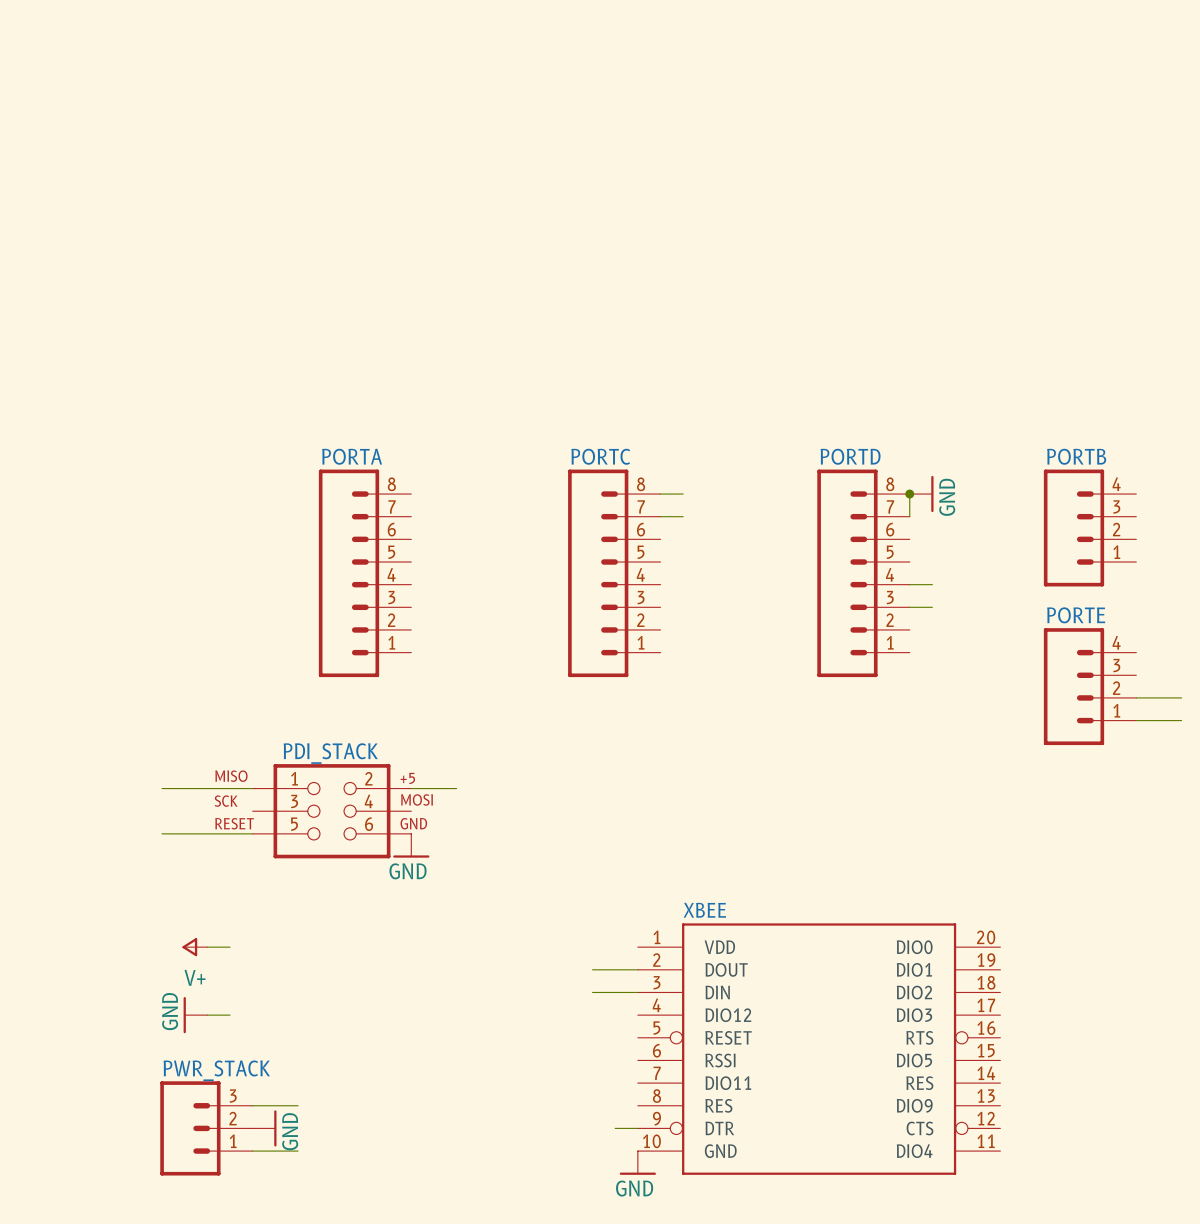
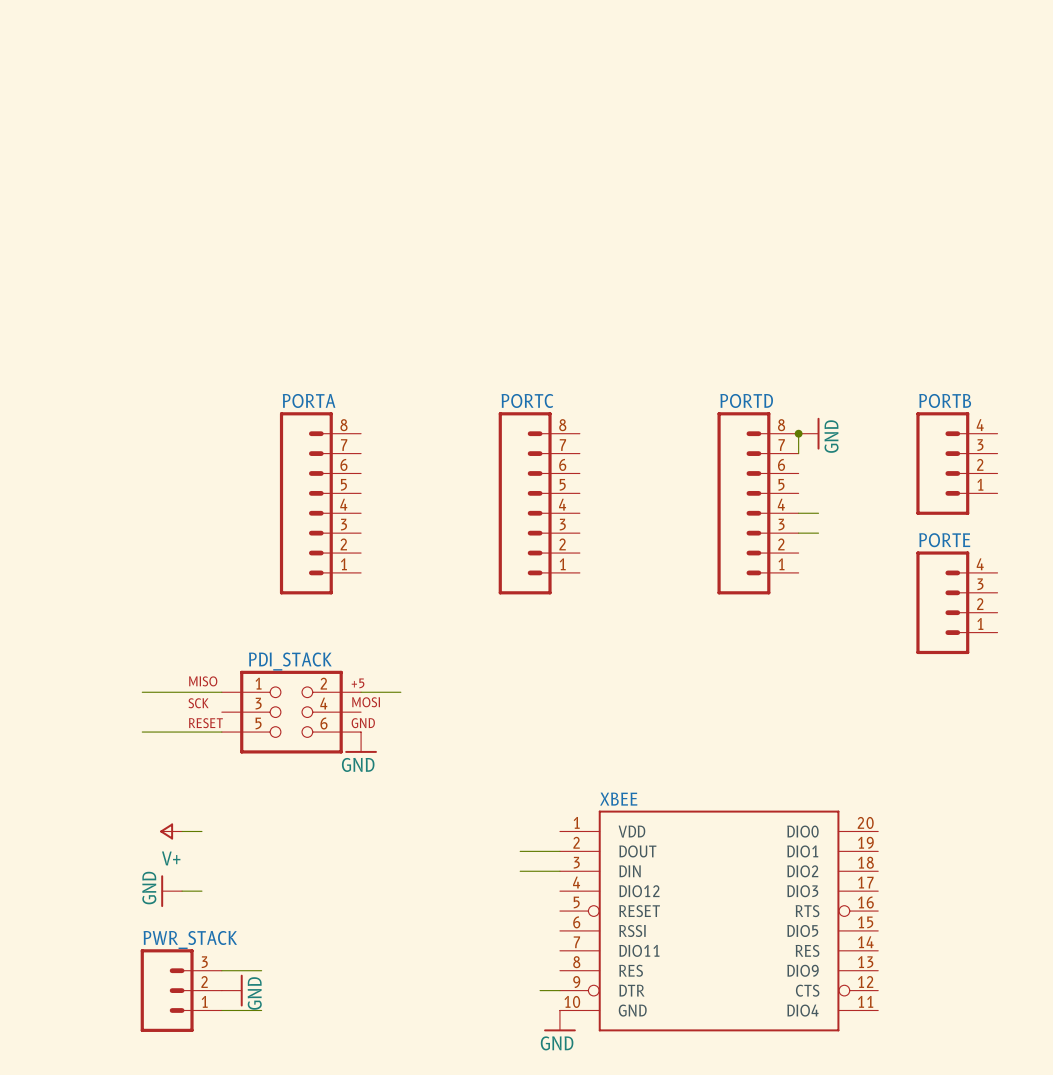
wire: (660, 494) (683, 494) -> none
wire: (660, 516) (683, 516) -> none
wire: (1136, 697) (1181, 697) -> none
wire: (1136, 720) (1181, 720) -> none

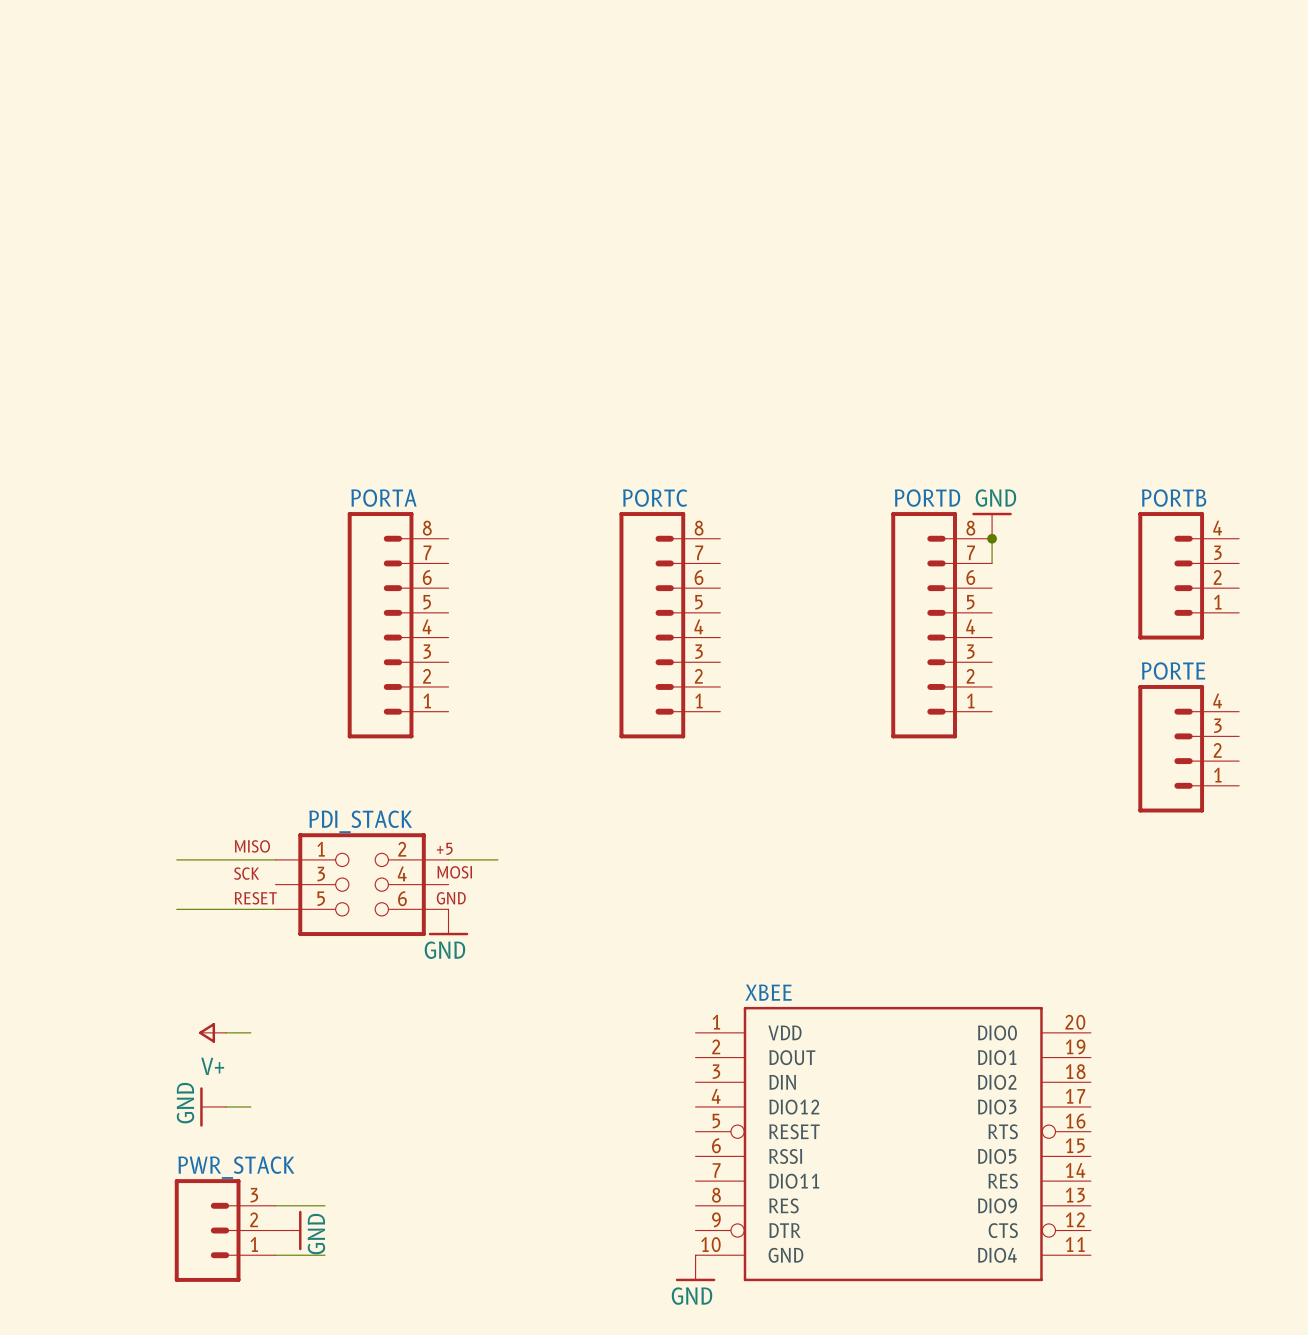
power symbol rotation: 0° (818, 433) -> 90° counterclockwise (992, 514)
wire: (798, 513) (818, 513) -> none
wire: (798, 533) (818, 533) -> none
wire: (520, 851) (559, 851) -> none
wire: (520, 871) (559, 871) -> none
wire: (540, 990) (559, 990) -> none

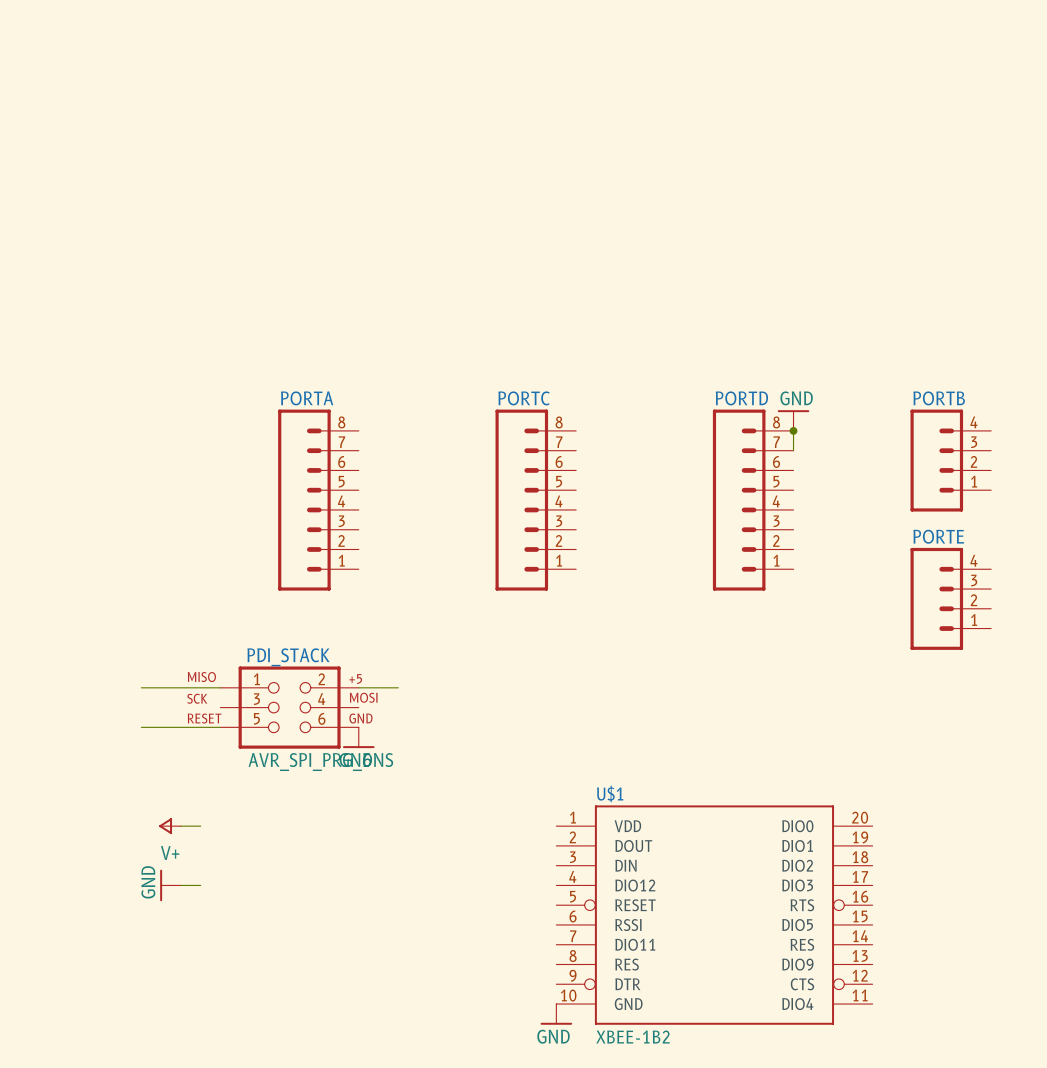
PDI_STACK value: none -> AVR_SPI_PRG_6NS (320, 762)
XBEE name: XBEE (768, 992) -> U$1 (610, 793)
wire: (275, 1205) (324, 1205) -> none
PWR_STACK: (225, 1230) -> none
power symbol: GND (288, 1230) -> none
wire: (275, 1255) (324, 1255) -> none
XBEE value: none -> XBEE-1B2 (633, 1037)

